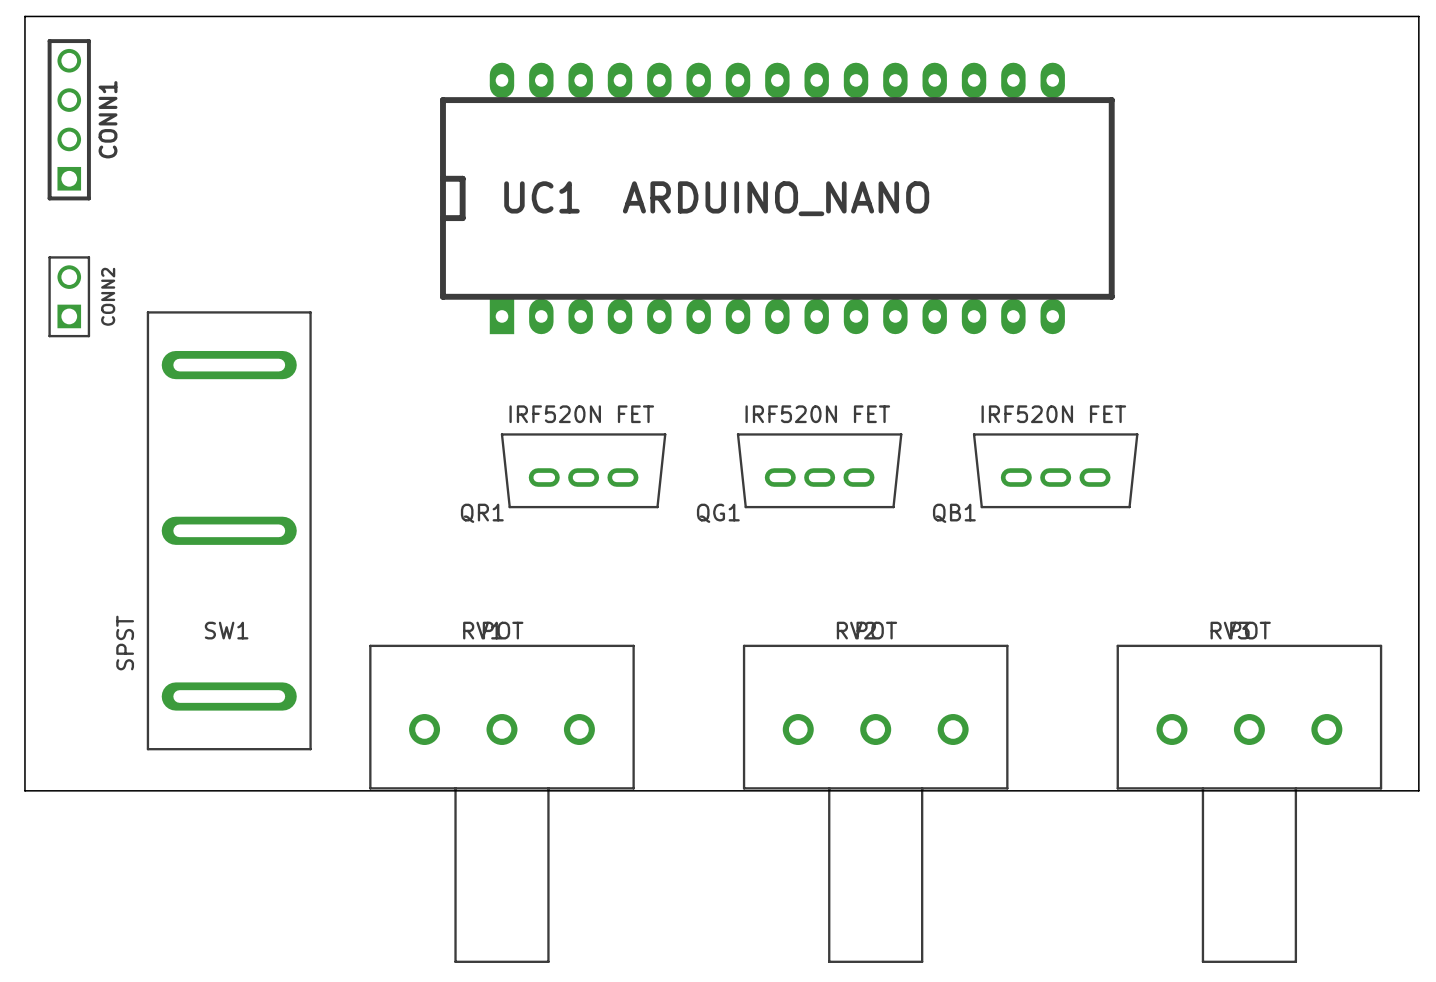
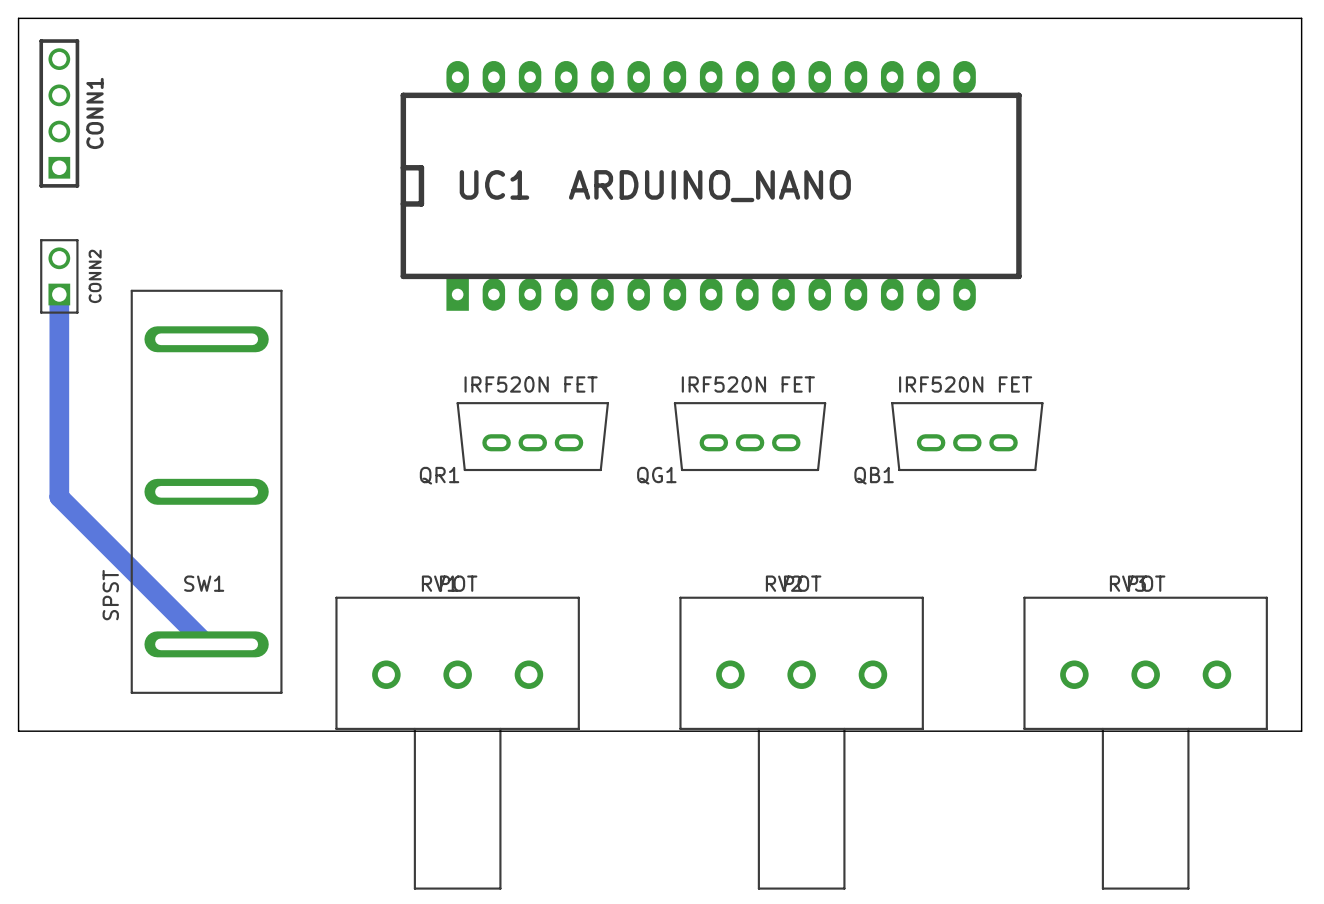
bottom track: none -> (59, 294) (59, 497) (206, 644)

